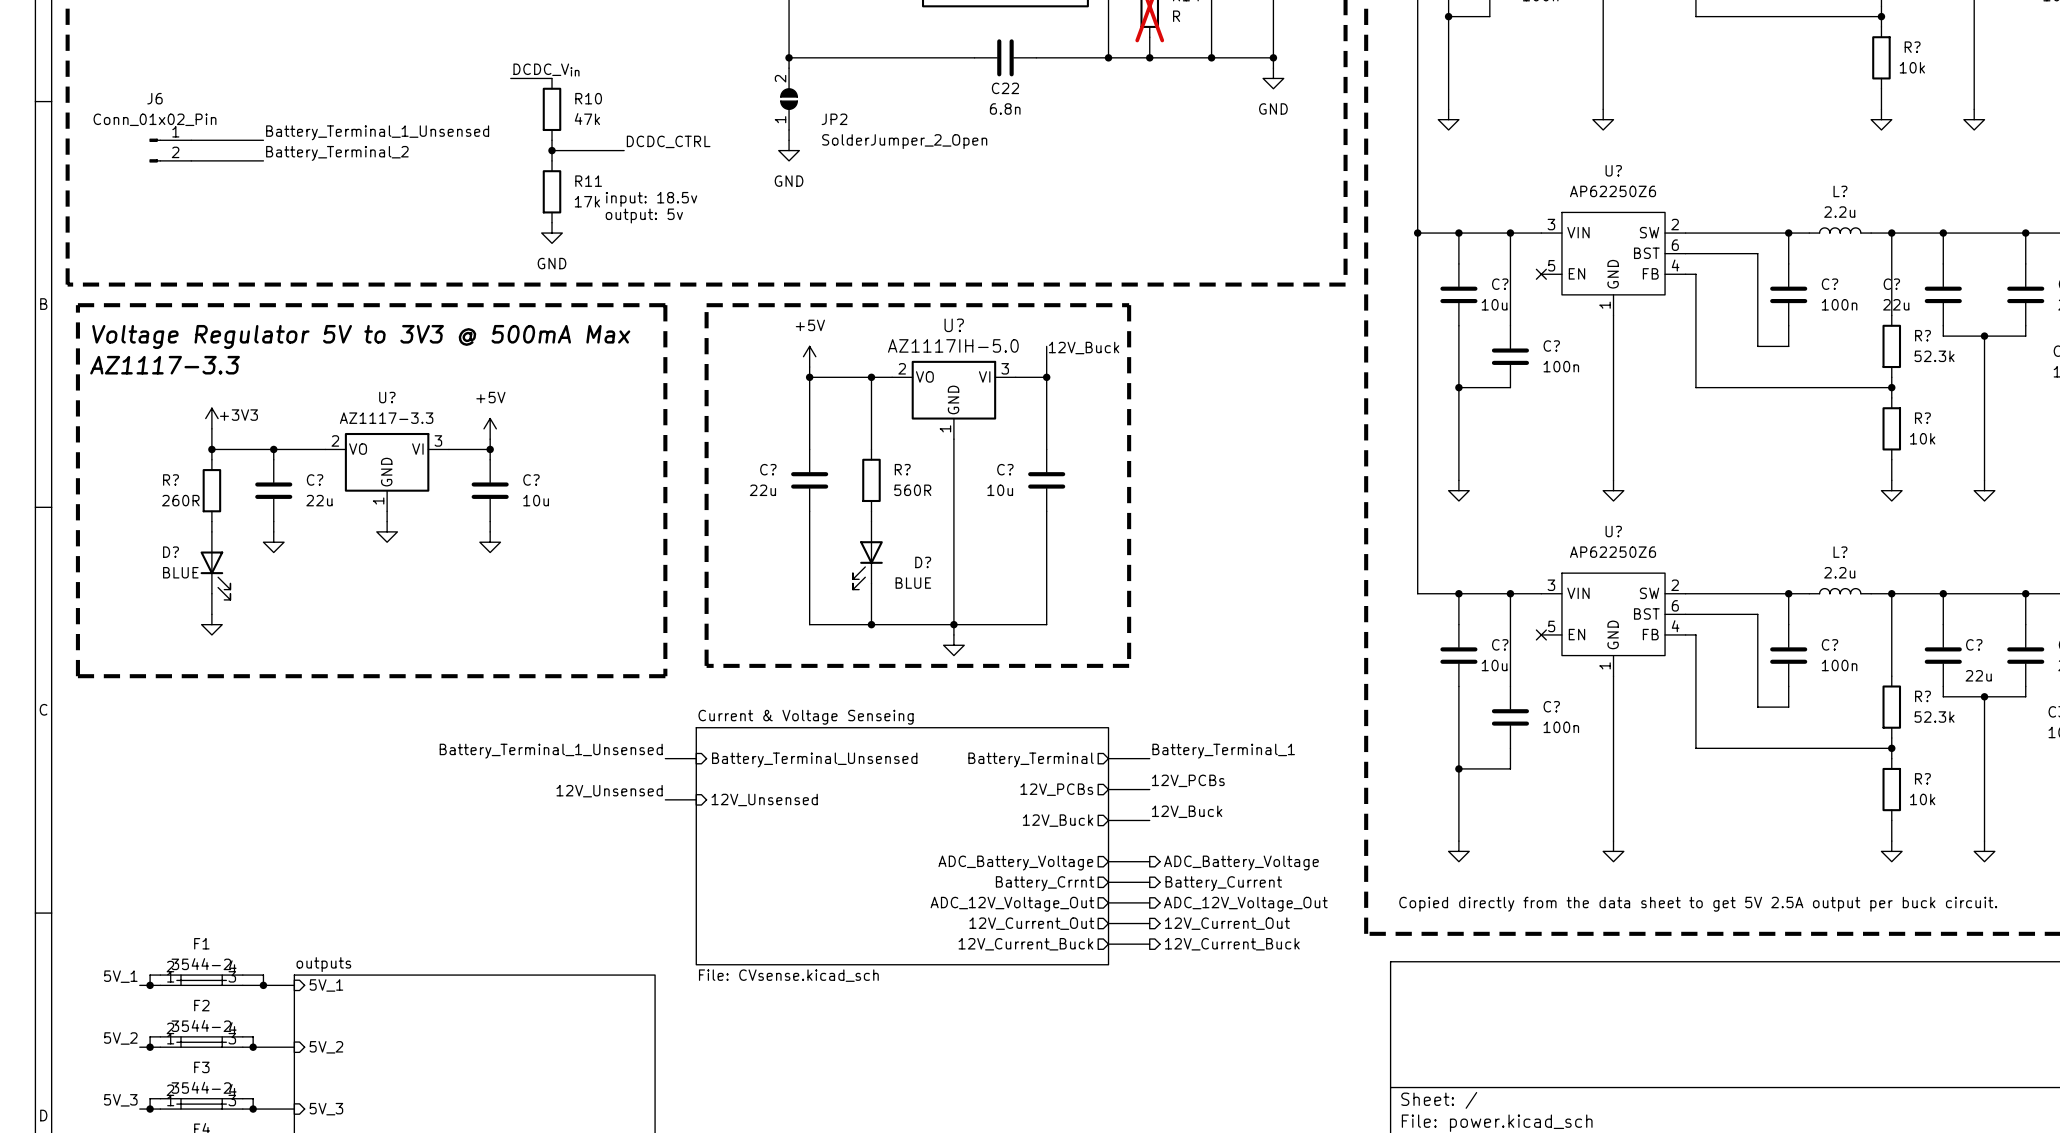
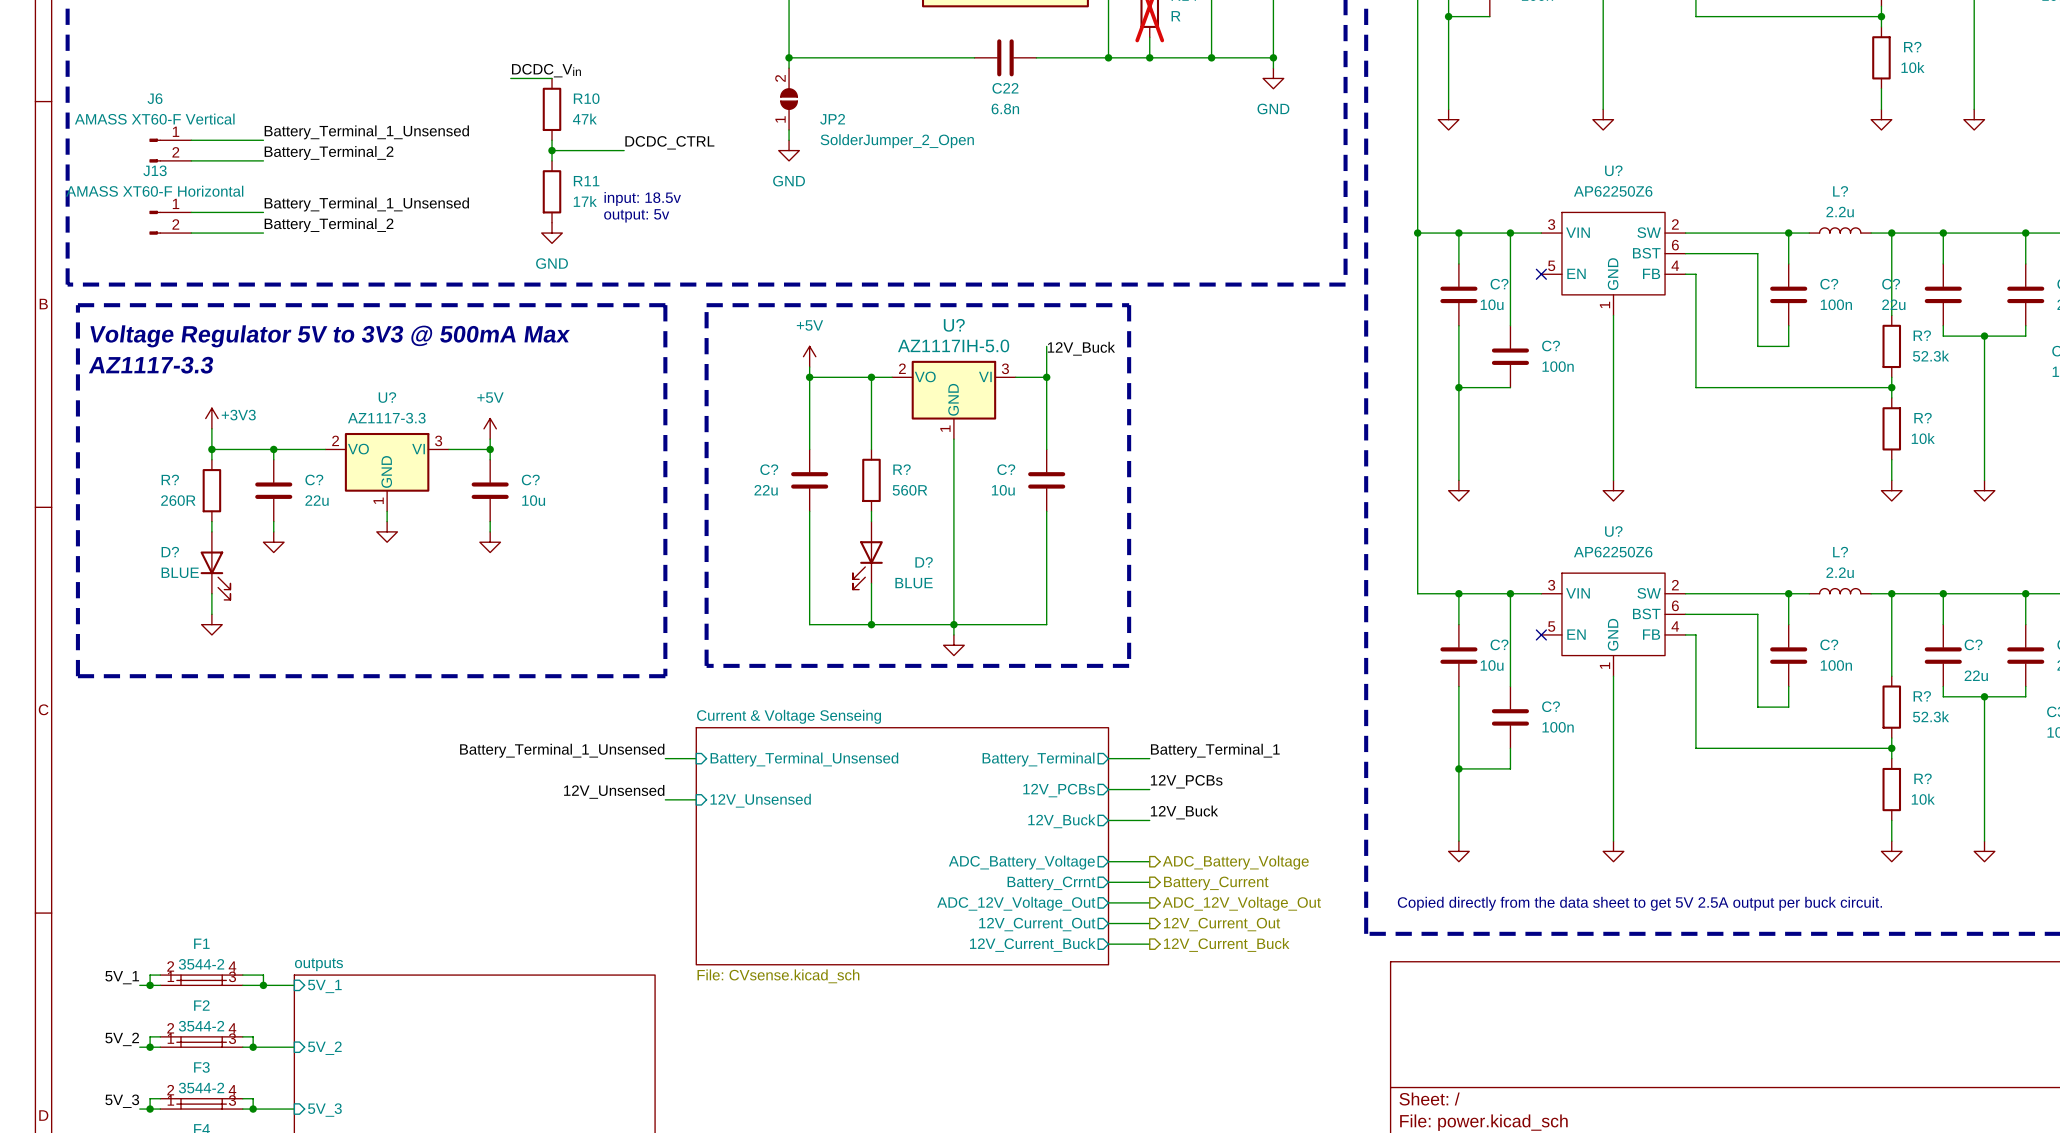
J6 value: Conn_01x02_Pin (154, 119) -> AMASS XT60-F Vertical (154, 119)
label: none -> Battery_Terminal_1_Unsensed (366, 204)
wire: none -> (191, 212) (263, 212)
J13: none -> AMASS XT60-F Horizontal (170, 222)
label: none -> Battery_Terminal_2 (329, 225)
wire: none -> (191, 233) (263, 233)

